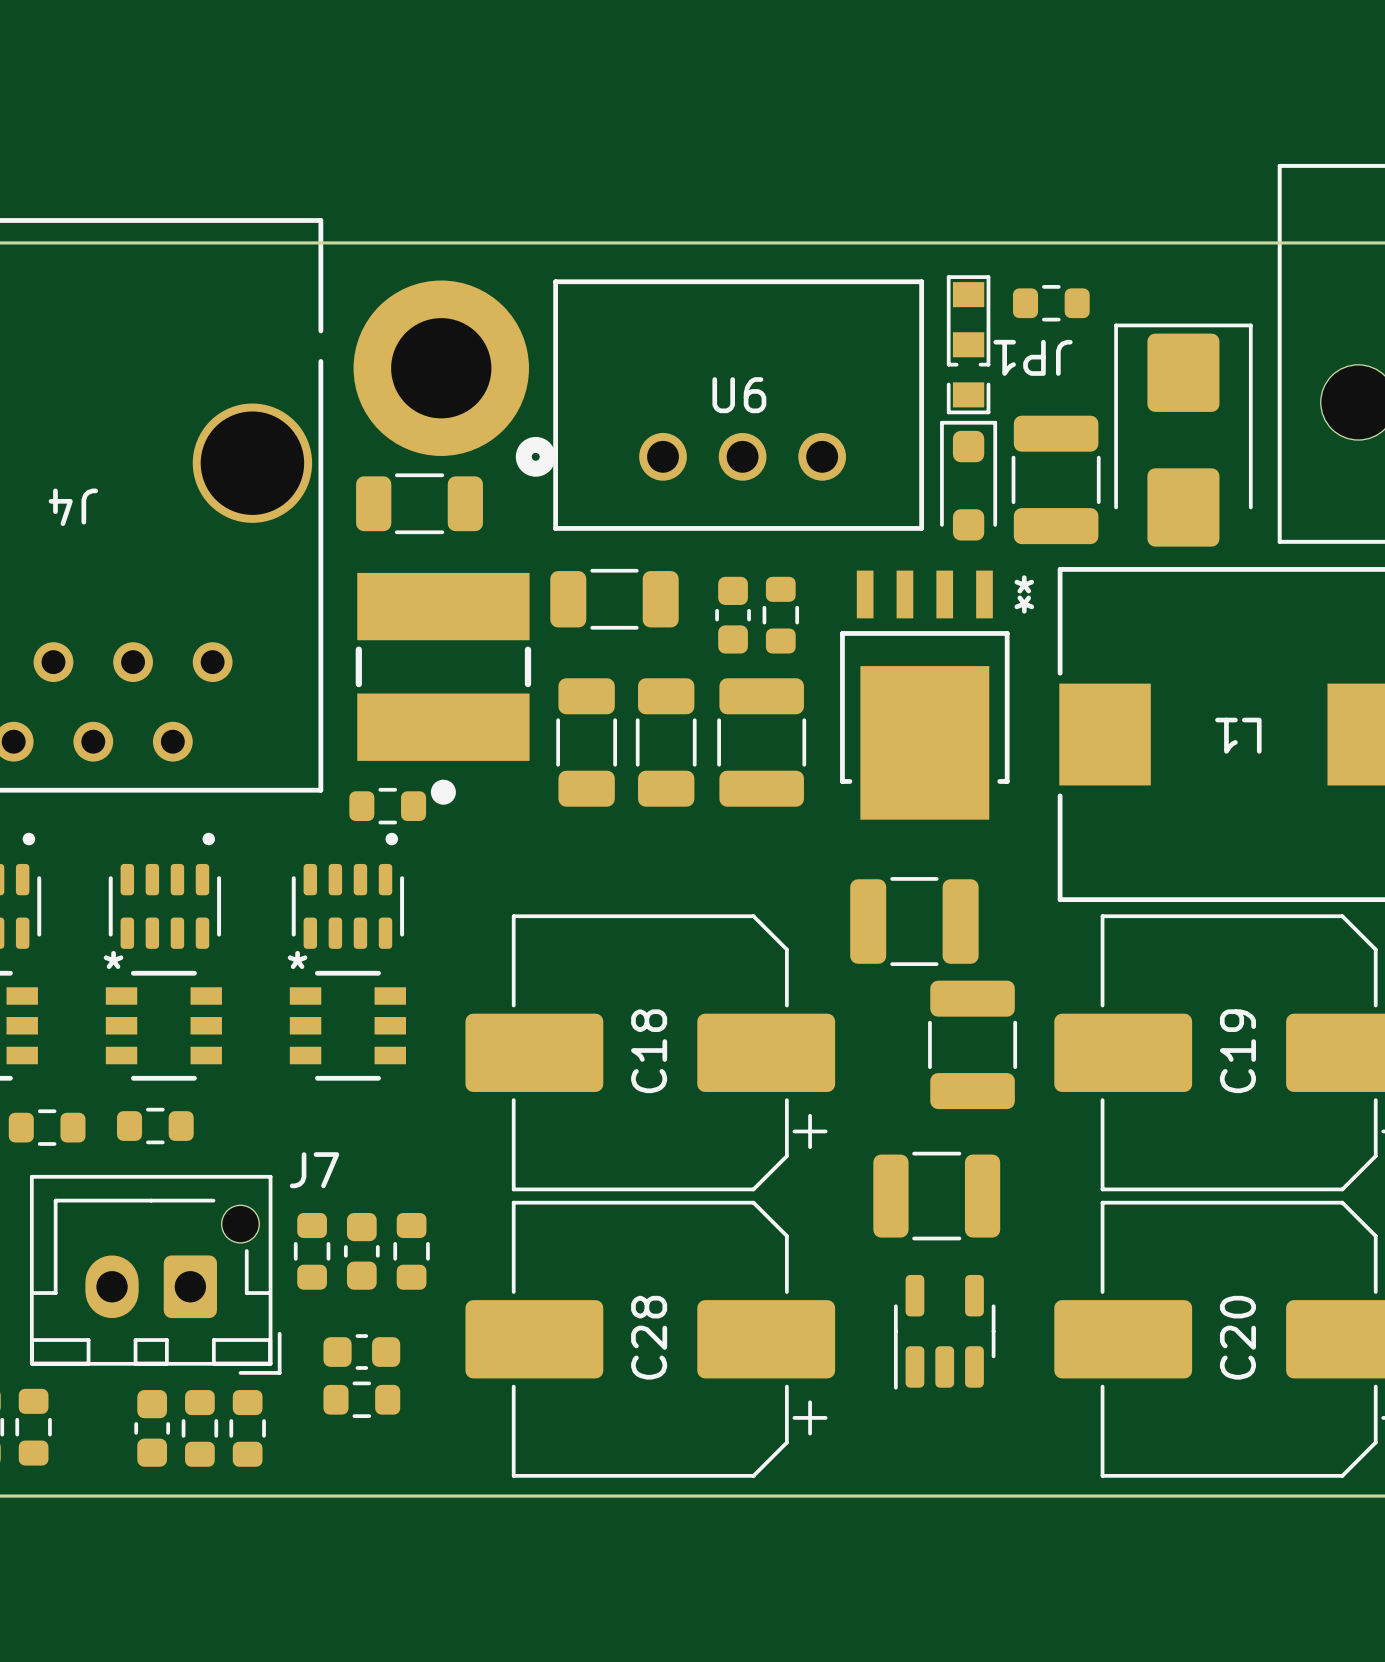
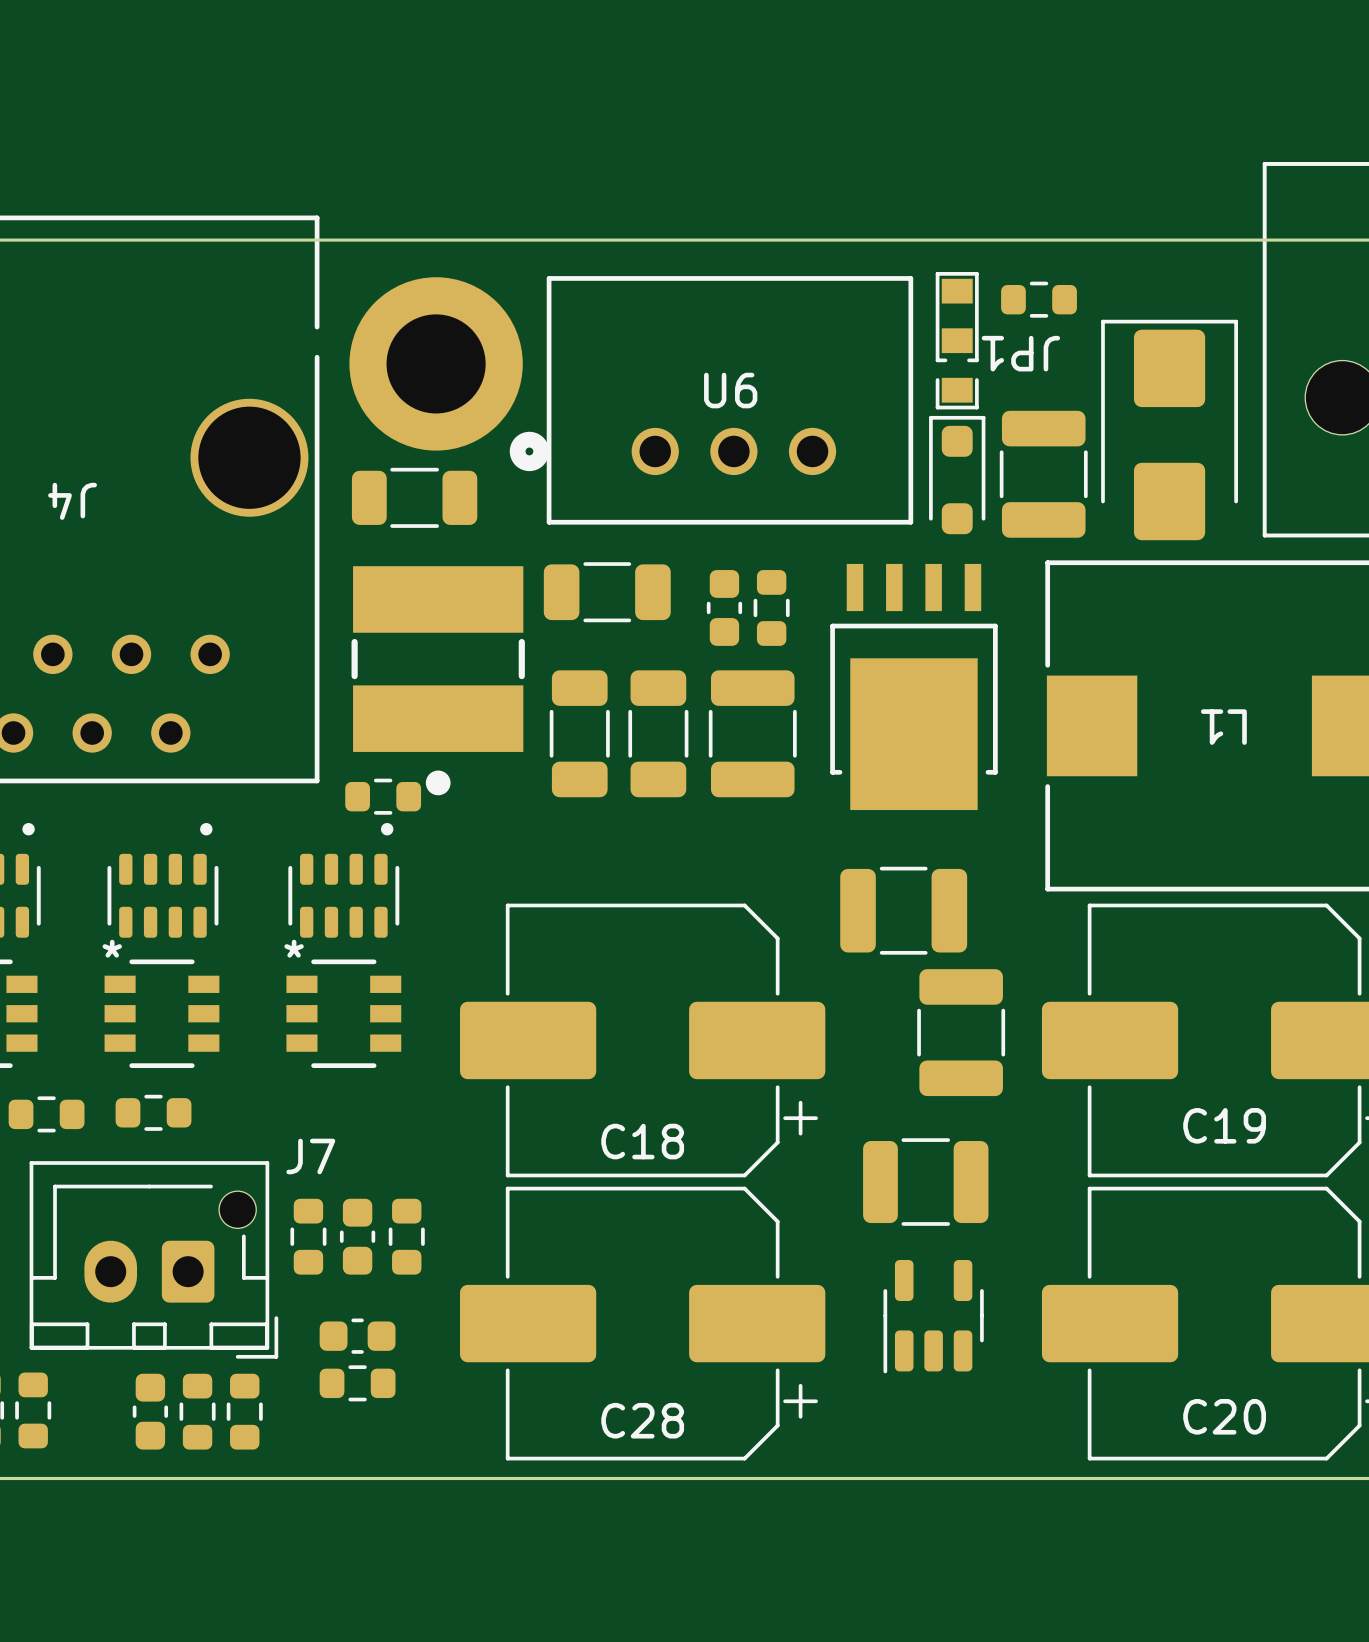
part footprint: [840, 570, 1010, 820] -> [830, 563, 998, 811]
C18 name rotation: 0° (649, 1051) -> 90° clockwise (642, 1141)
C19 name rotation: 0° (1237, 1051) -> 90° clockwise (1224, 1125)
C28 name rotation: 0° (649, 1337) -> 90° clockwise (642, 1420)
C20 name rotation: 0° (1237, 1337) -> 90° clockwise (1224, 1416)

